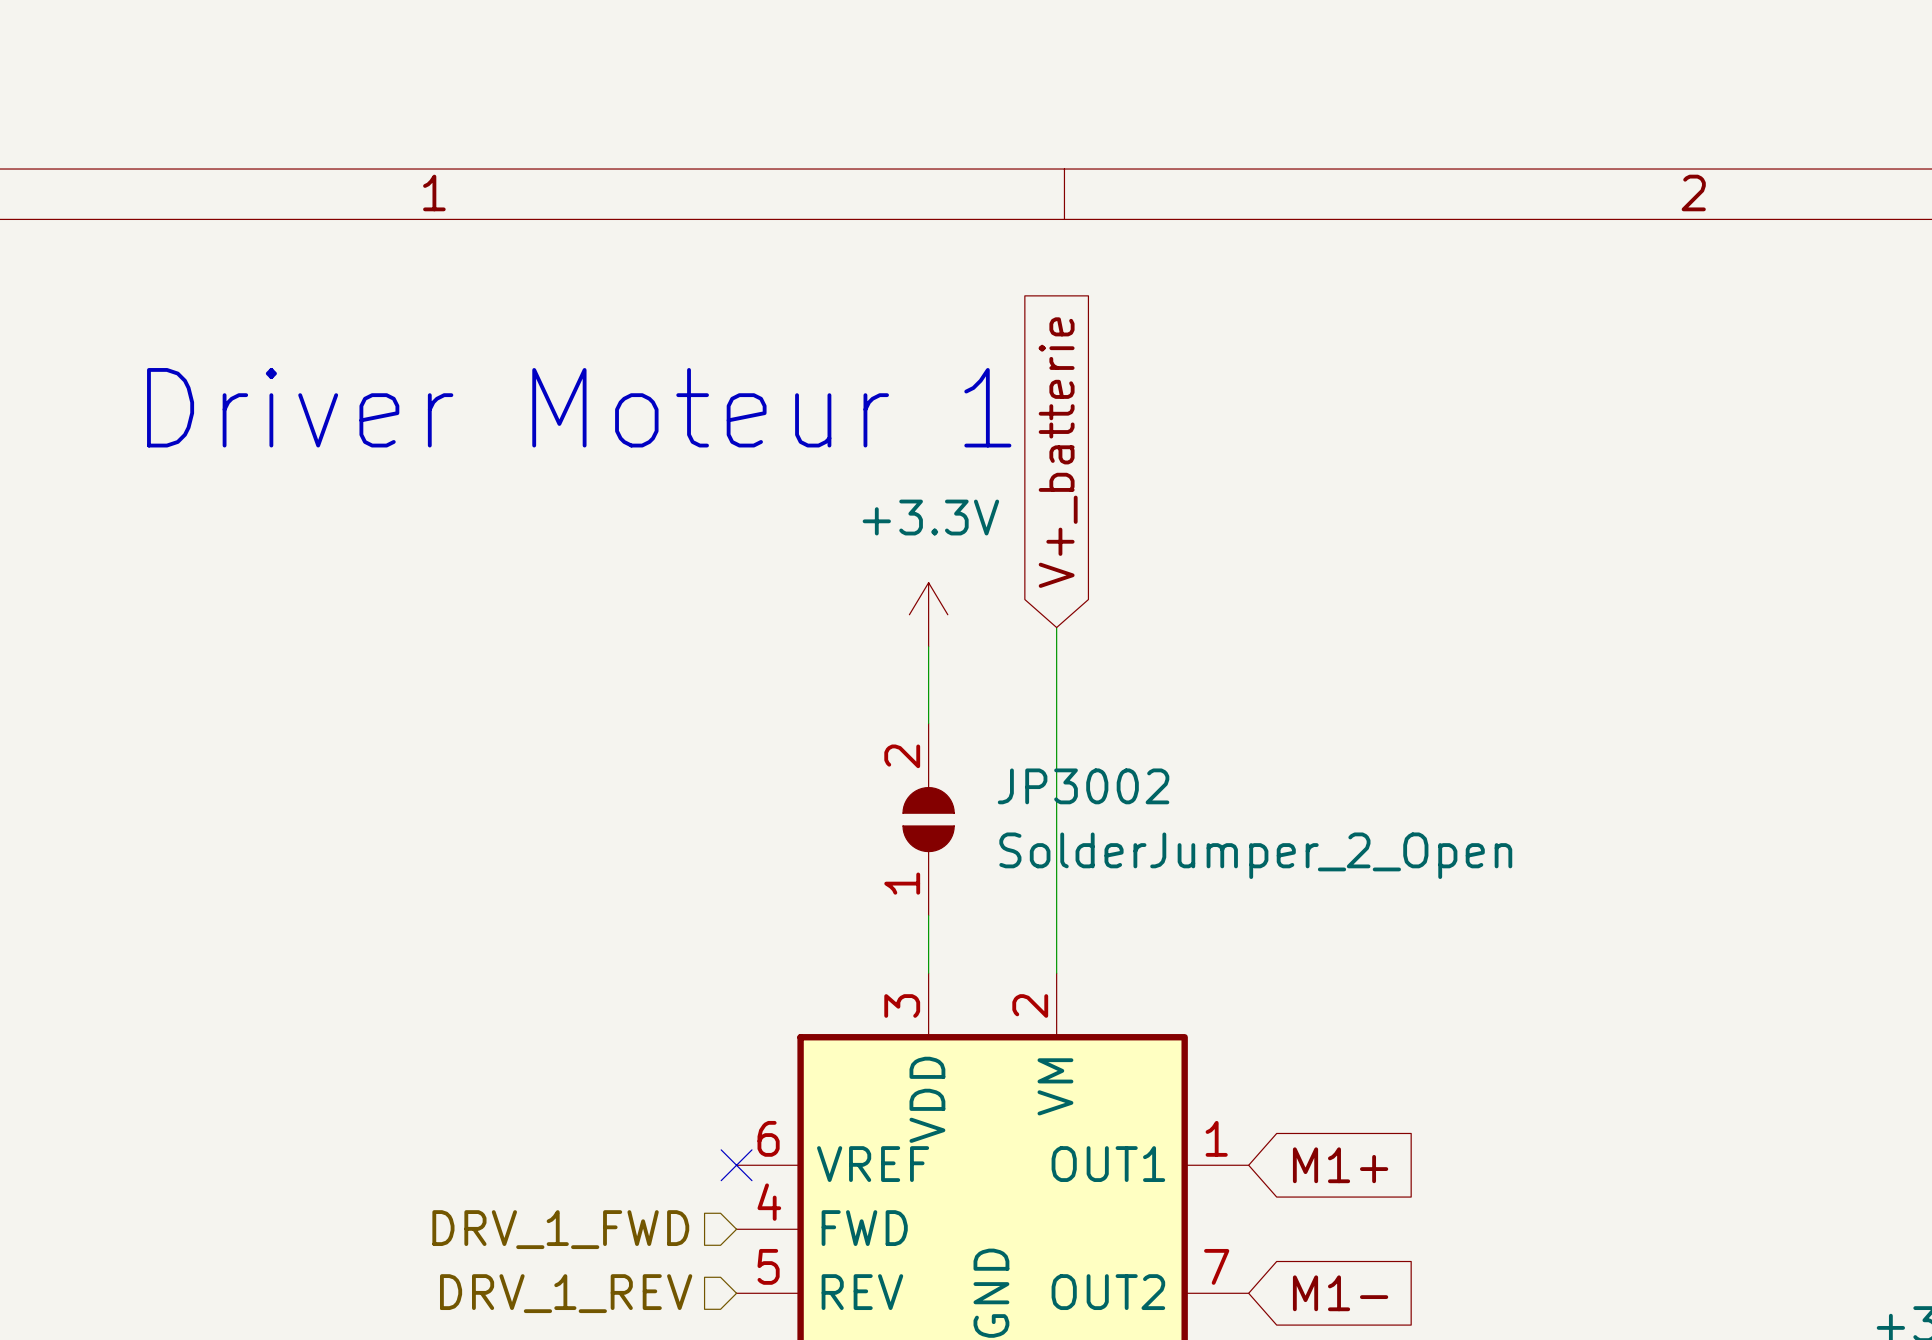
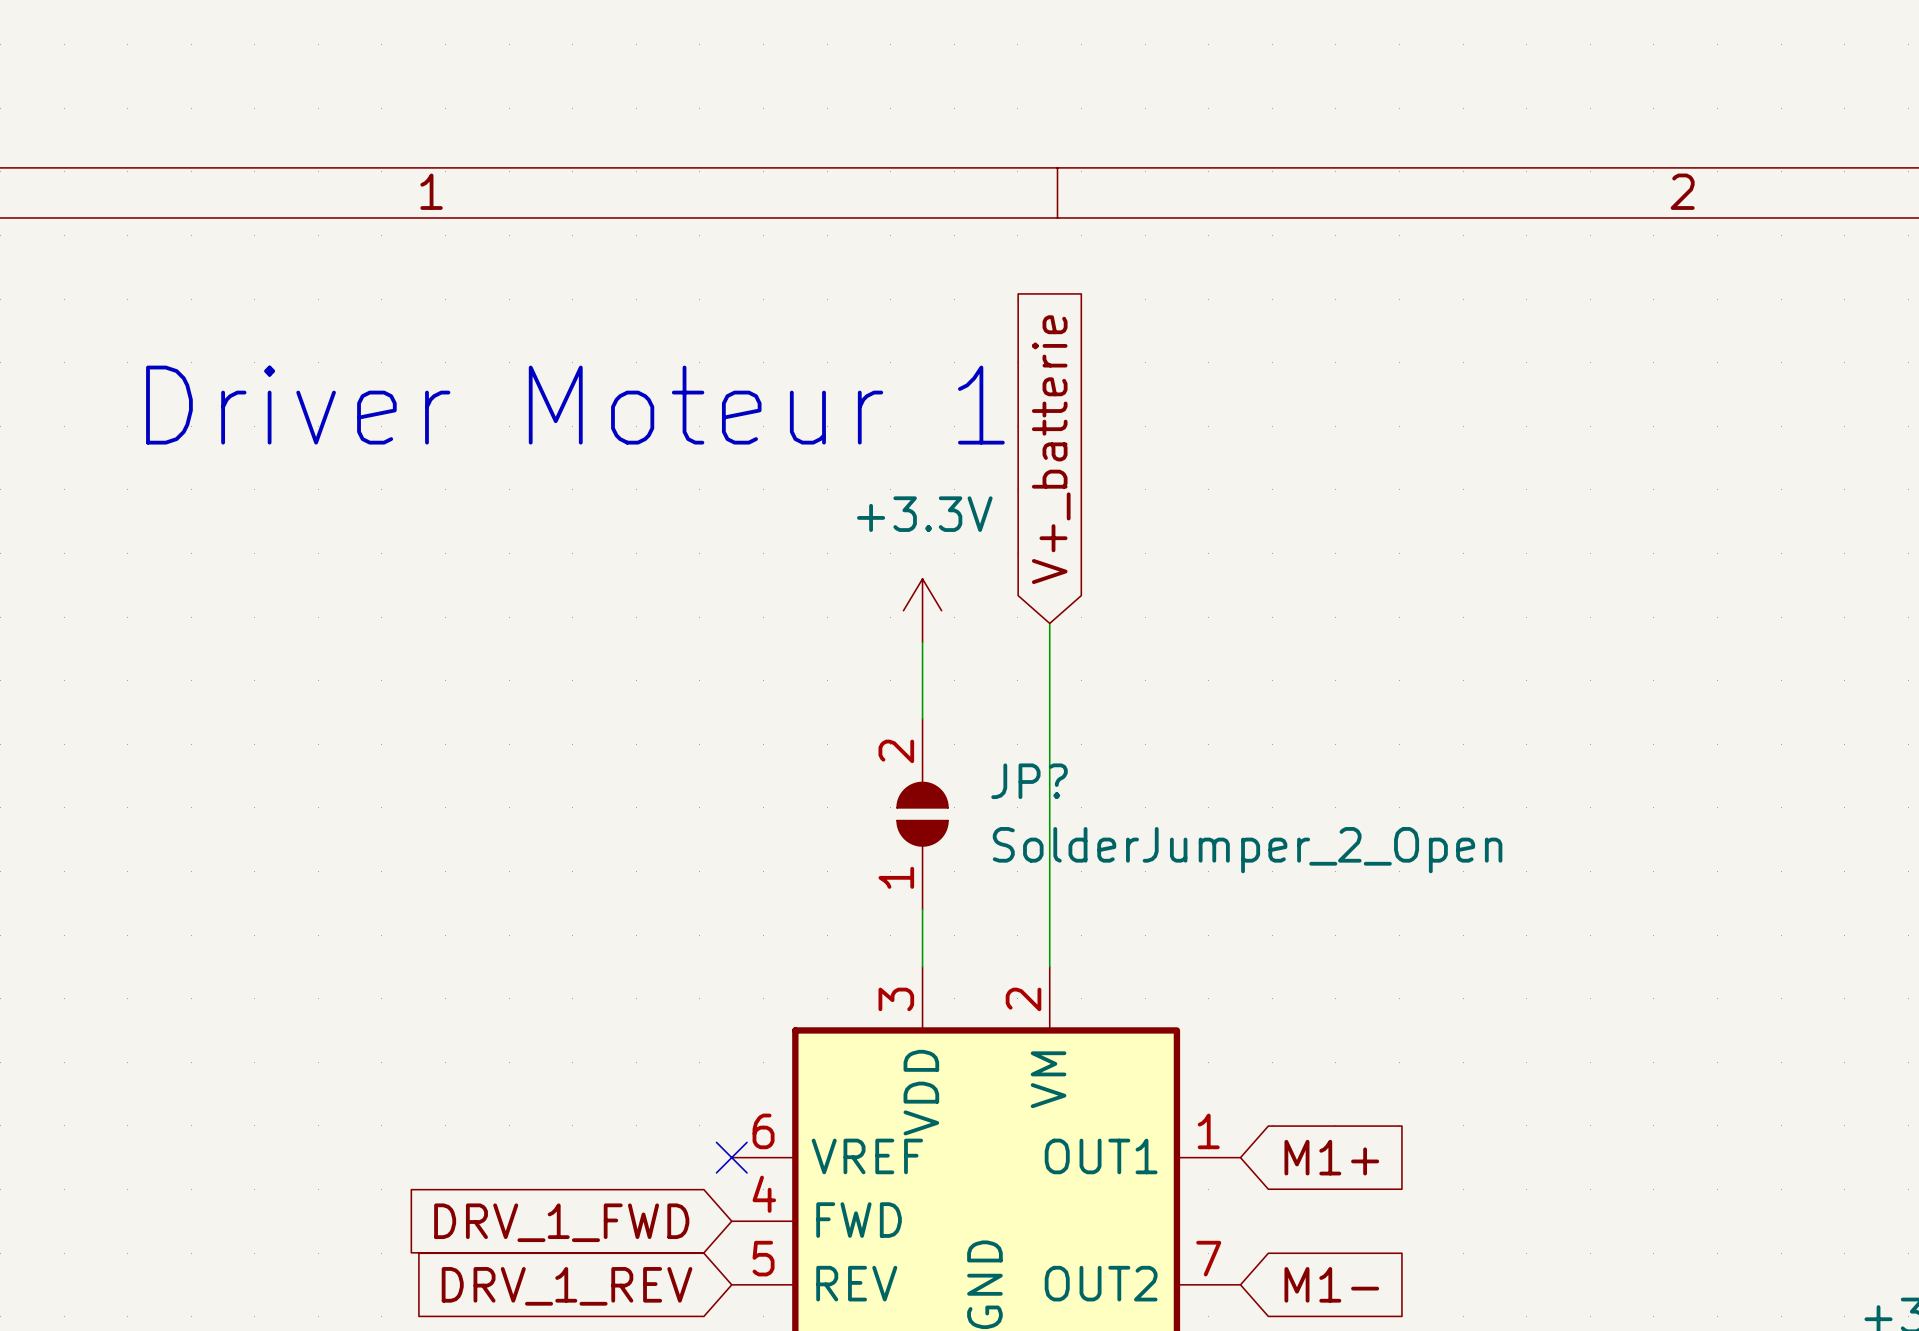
JP3002 name: JP3002 (1083, 786) -> JP? (1029, 781)
hierarchical label: DRV_1_FWD (560, 1229) -> none
global label: none -> DRV_1_FWD (561, 1222)
hierarchical label: DRV_1_REV (566, 1293) -> none
global label: none -> DRV_1_REV (567, 1286)

